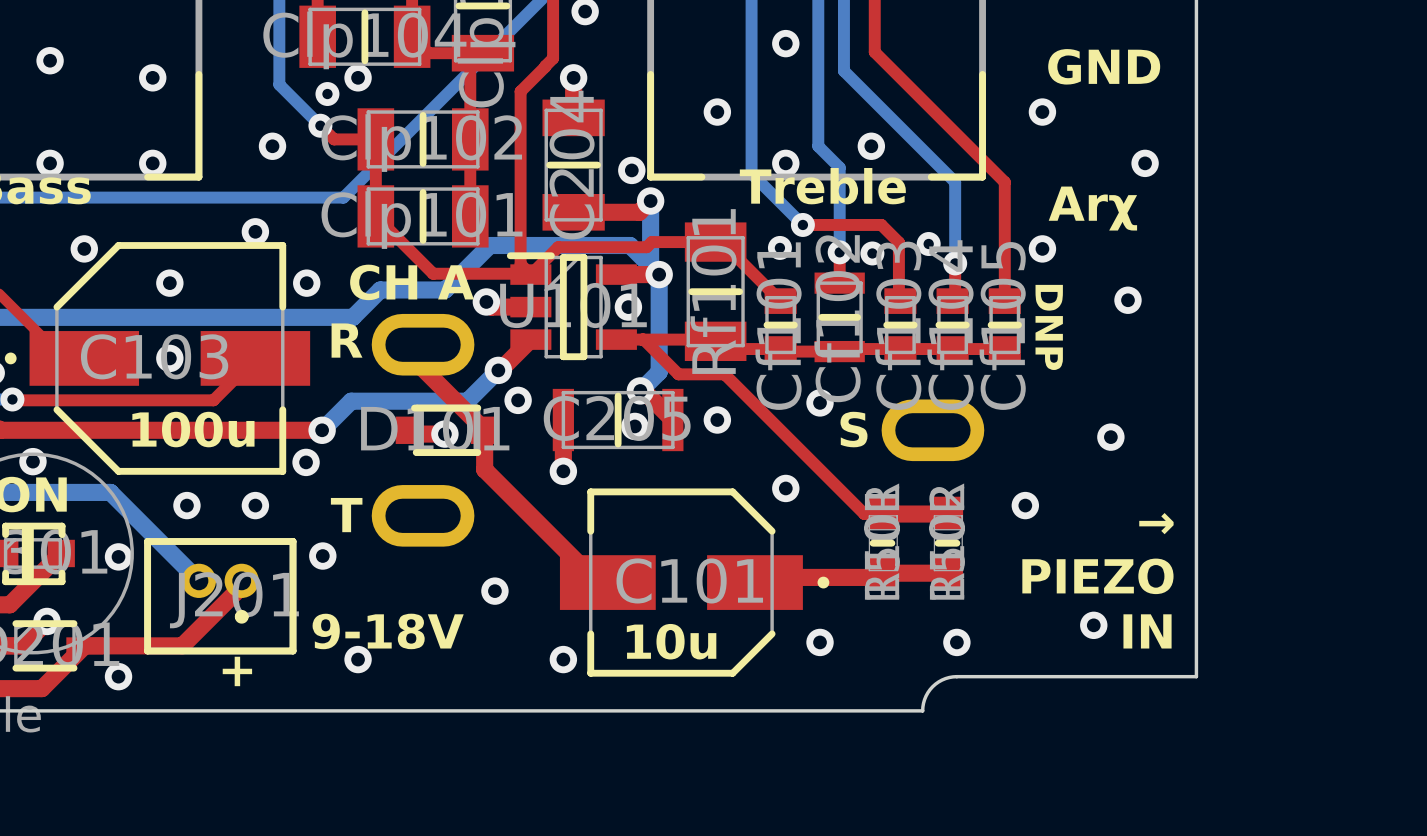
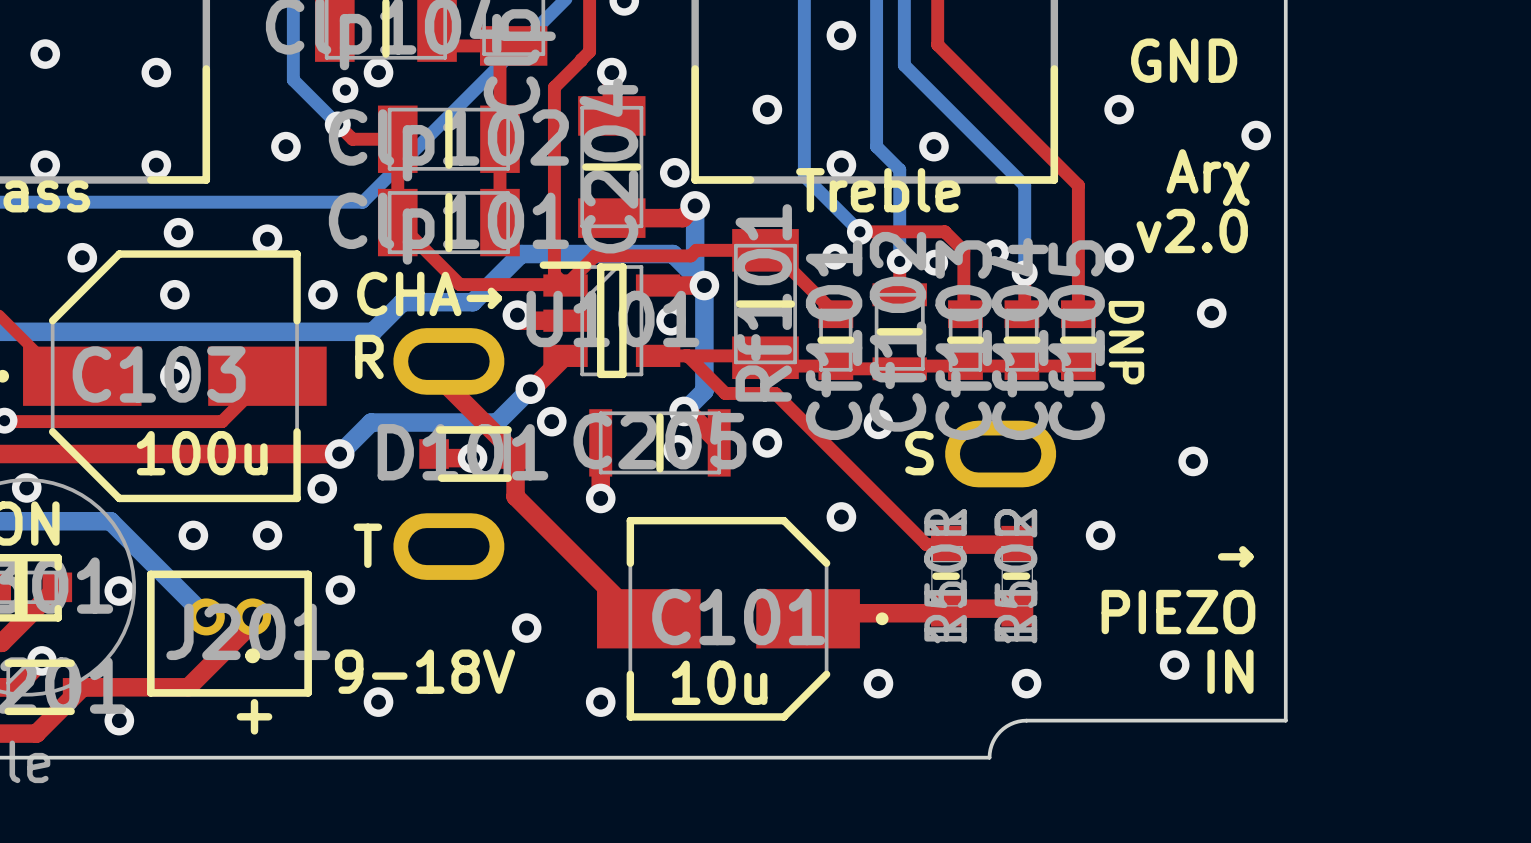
via position: (1145, 163) -> (1256, 135)
text position: Arχ (1092, 208) -> Arχ (1208, 177)
text: none -> v2.0 (1192, 231)
via: none -> (178, 232)
text: CH A (412, 282) -> CHA→ (429, 293)

